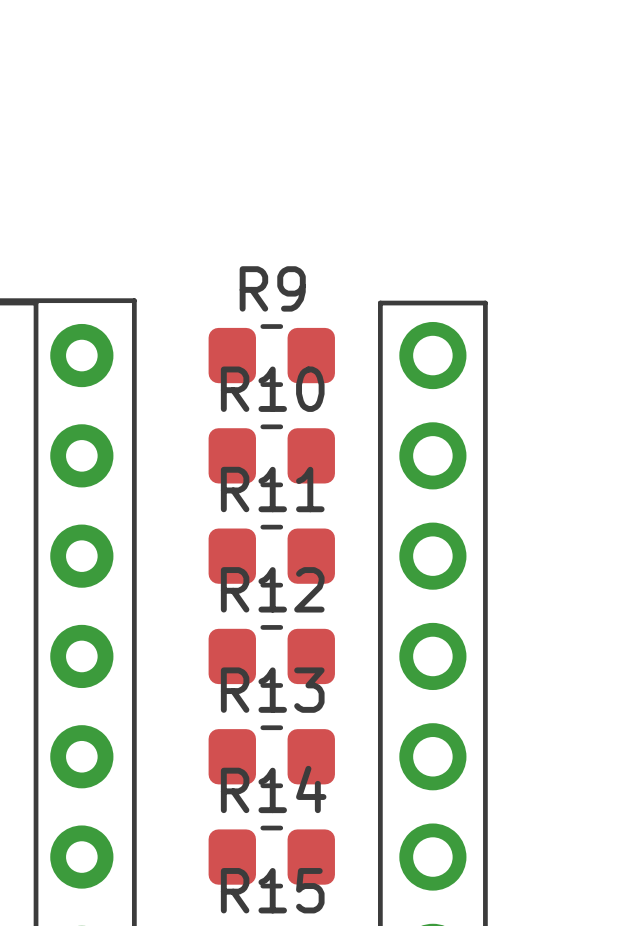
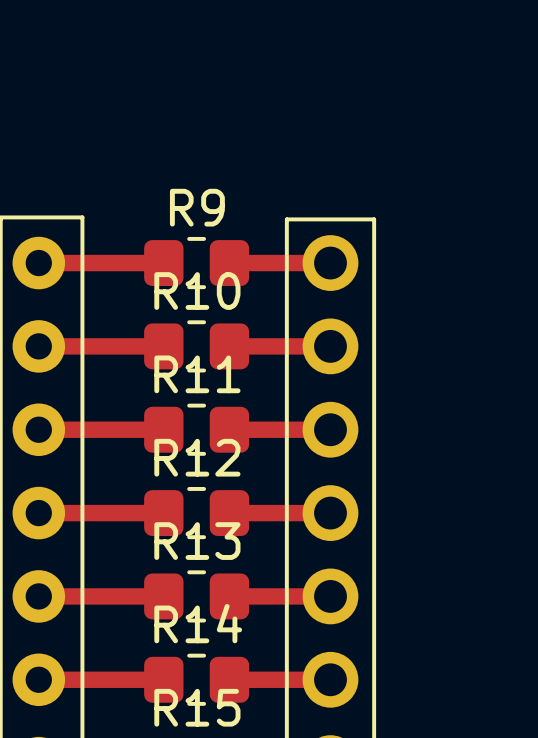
top track: none -> (38, 263) (163, 263)
top track: none -> (229, 263) (330, 263)
top track: none -> (38, 346) (163, 346)
top track: none -> (229, 346) (330, 346)
top track: none -> (38, 429) (163, 429)
top track: none -> (229, 429) (330, 429)
top track: none -> (38, 513) (163, 513)
top track: none -> (229, 513) (330, 513)
top track: none -> (38, 596) (163, 596)
top track: none -> (229, 596) (330, 596)
top track: none -> (38, 679) (163, 679)
top track: none -> (229, 679) (330, 679)

